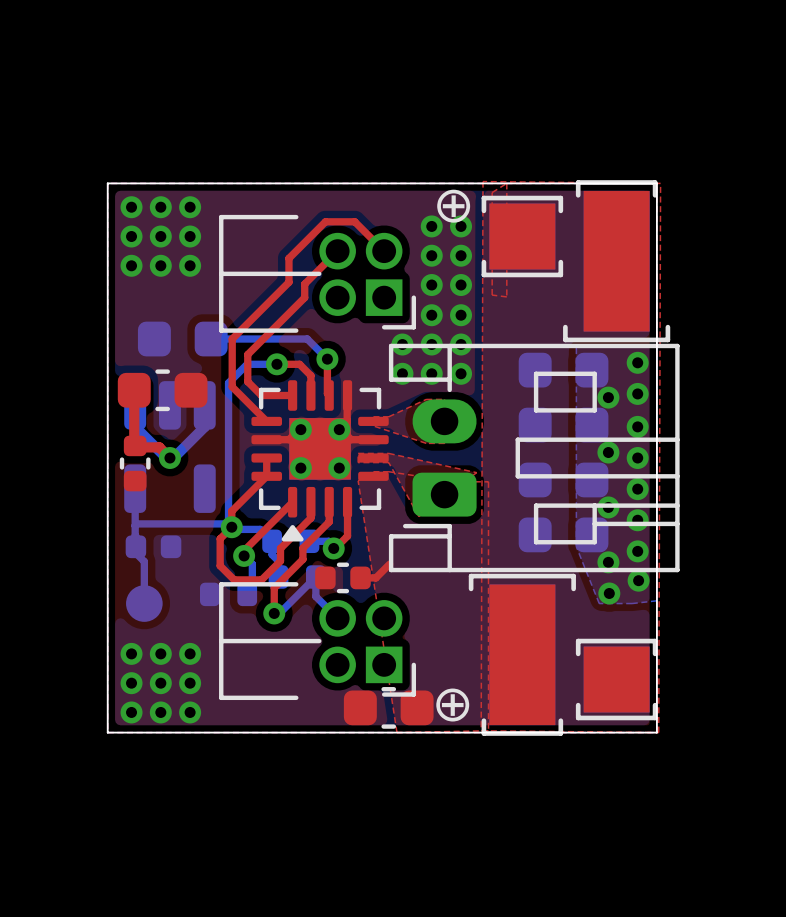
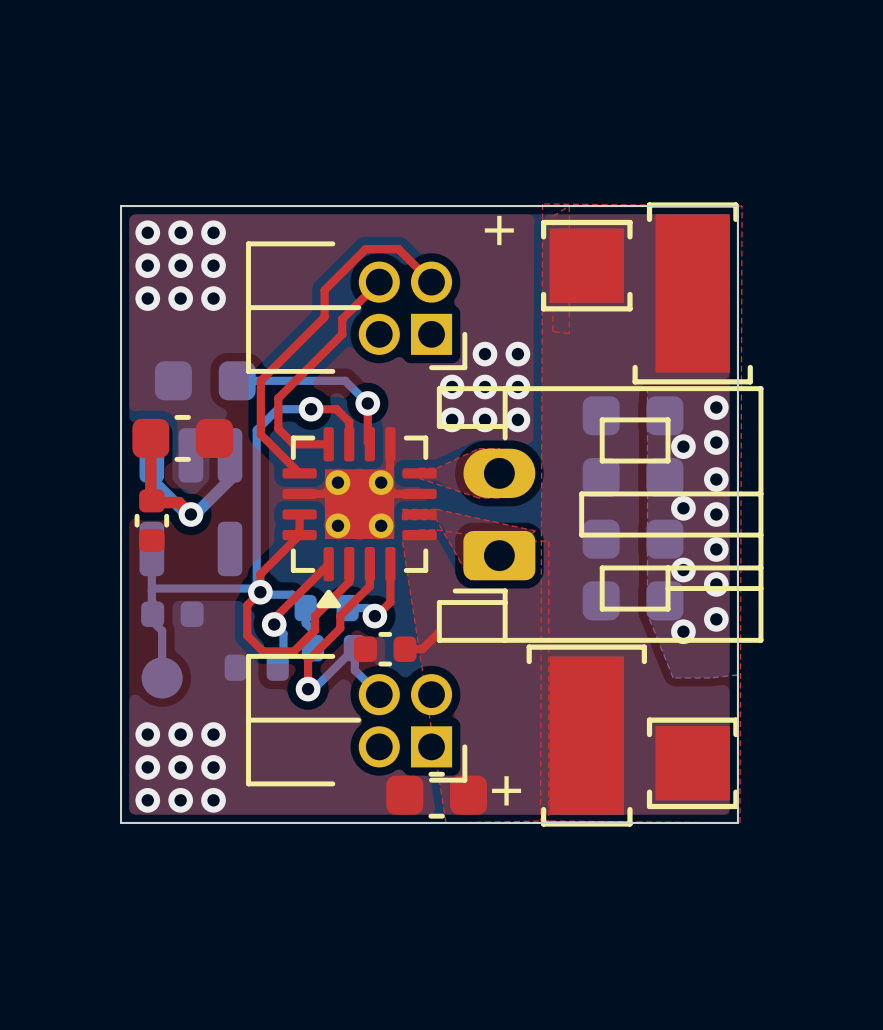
text: ⊕ (453, 206) -> + (499, 230)
via: (431, 226) -> none
via: (461, 226) -> none
via: (431, 255) -> none
via: (461, 255) -> none
via: (431, 285) -> none
via: (461, 285) -> none
via: (638, 580) -> none
via: (609, 593) -> none
text: ⊕ (452, 705) -> + (506, 790)

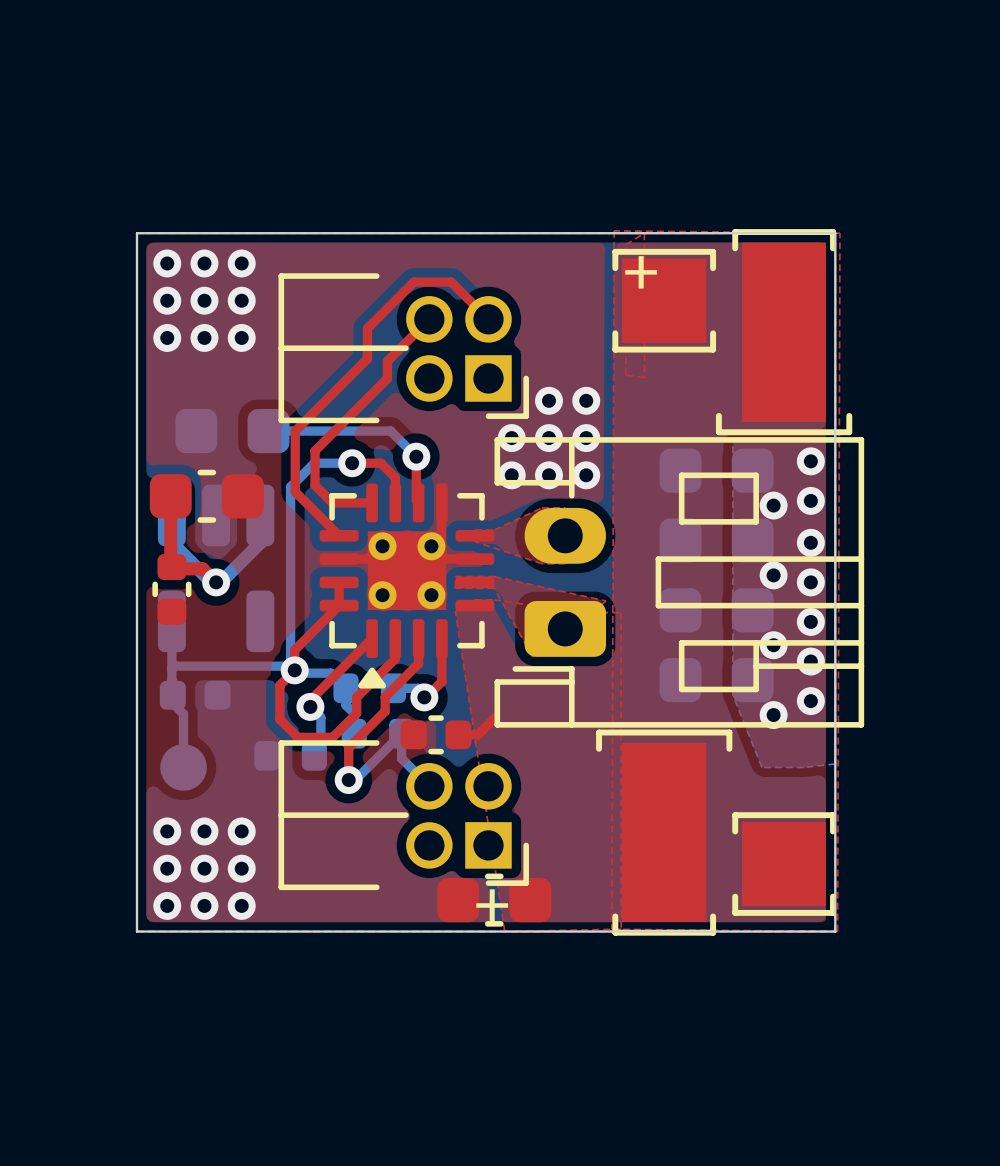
text position: + (499, 230) -> + (641, 272)
text position: + (506, 790) -> + (492, 905)

